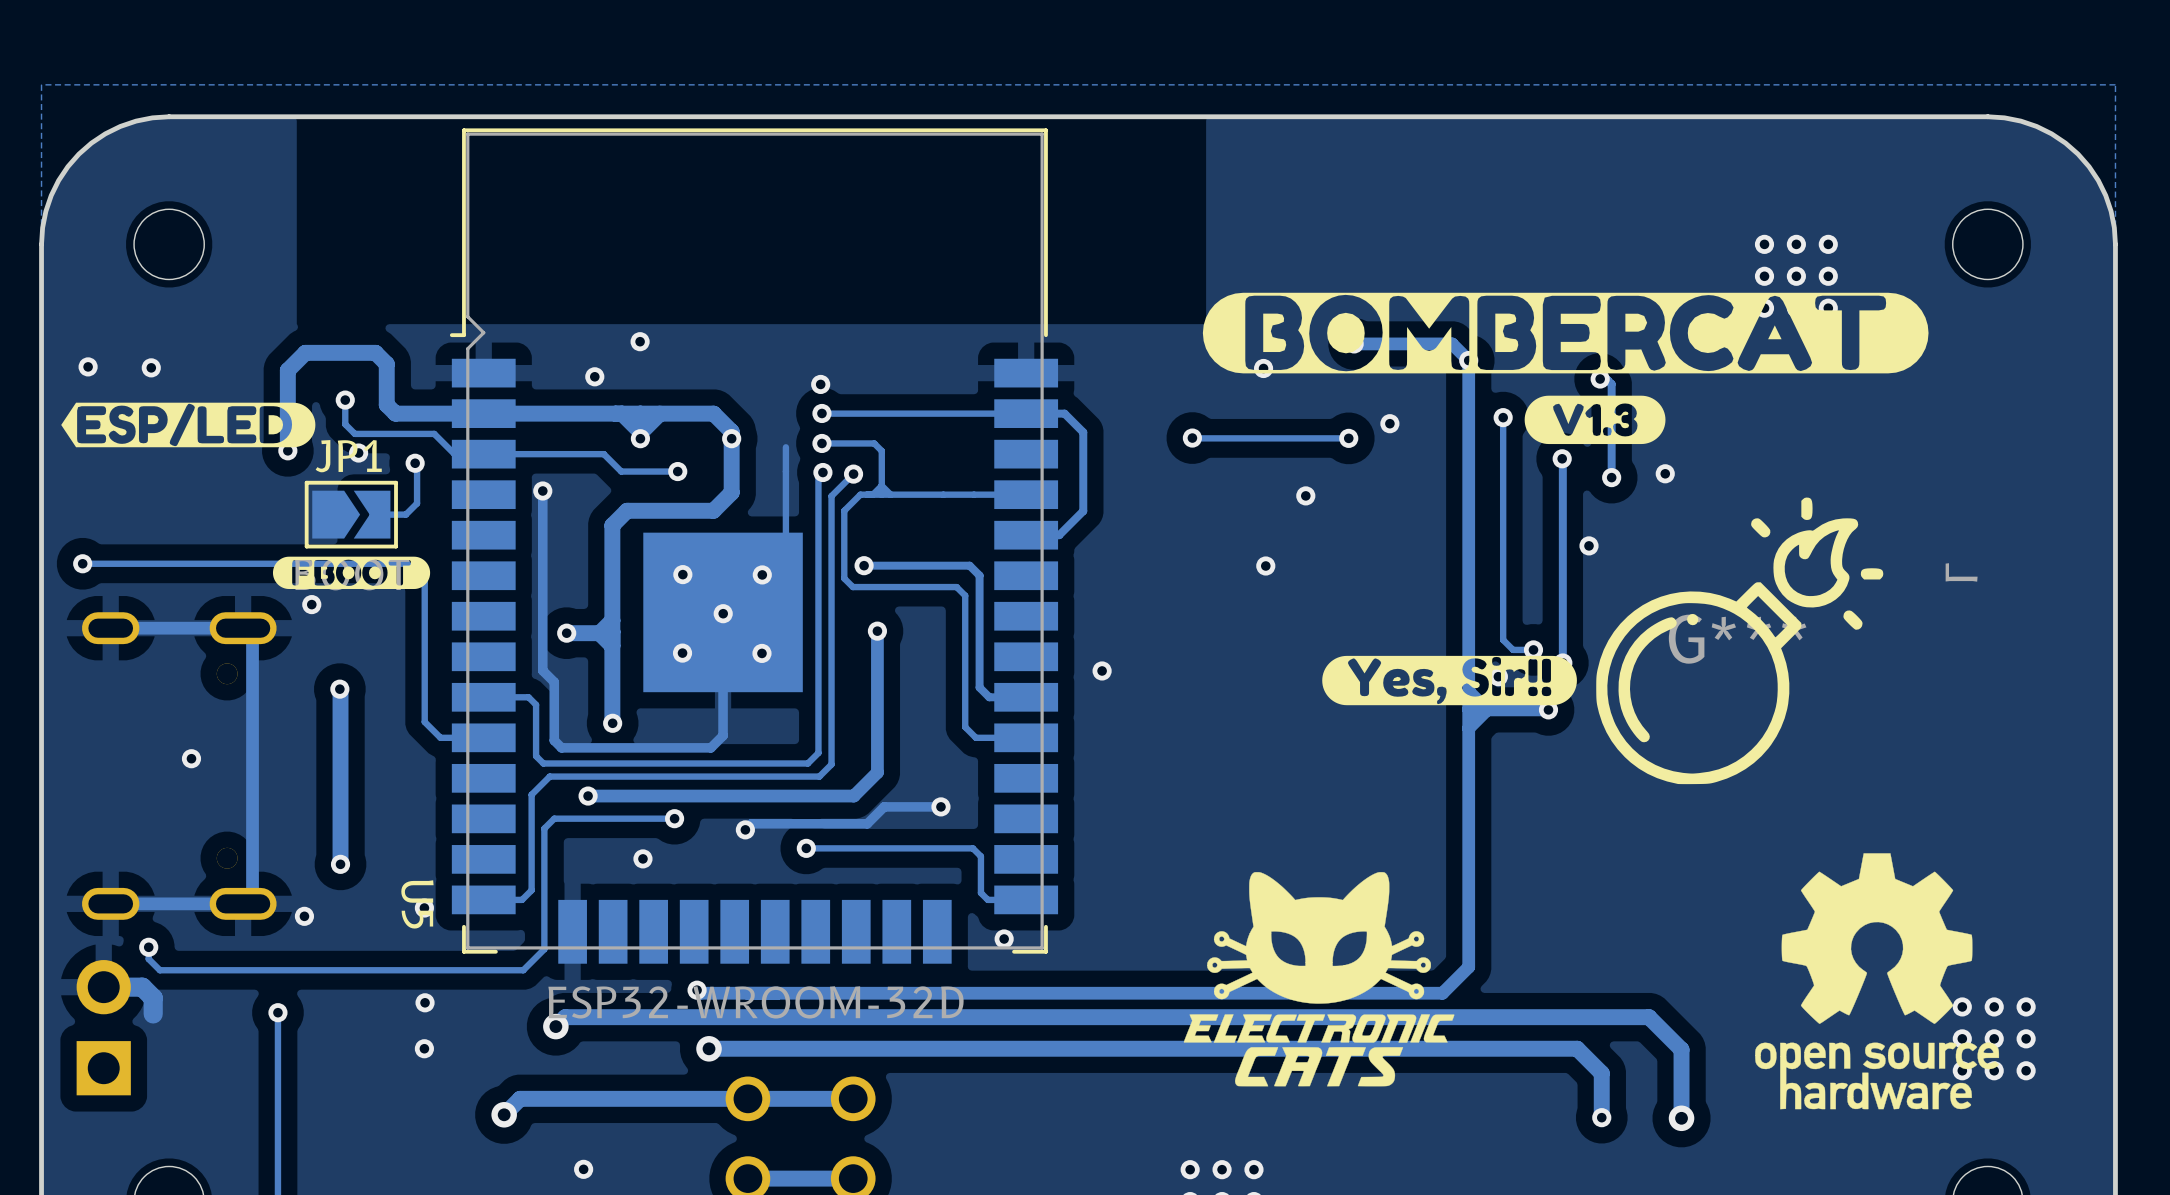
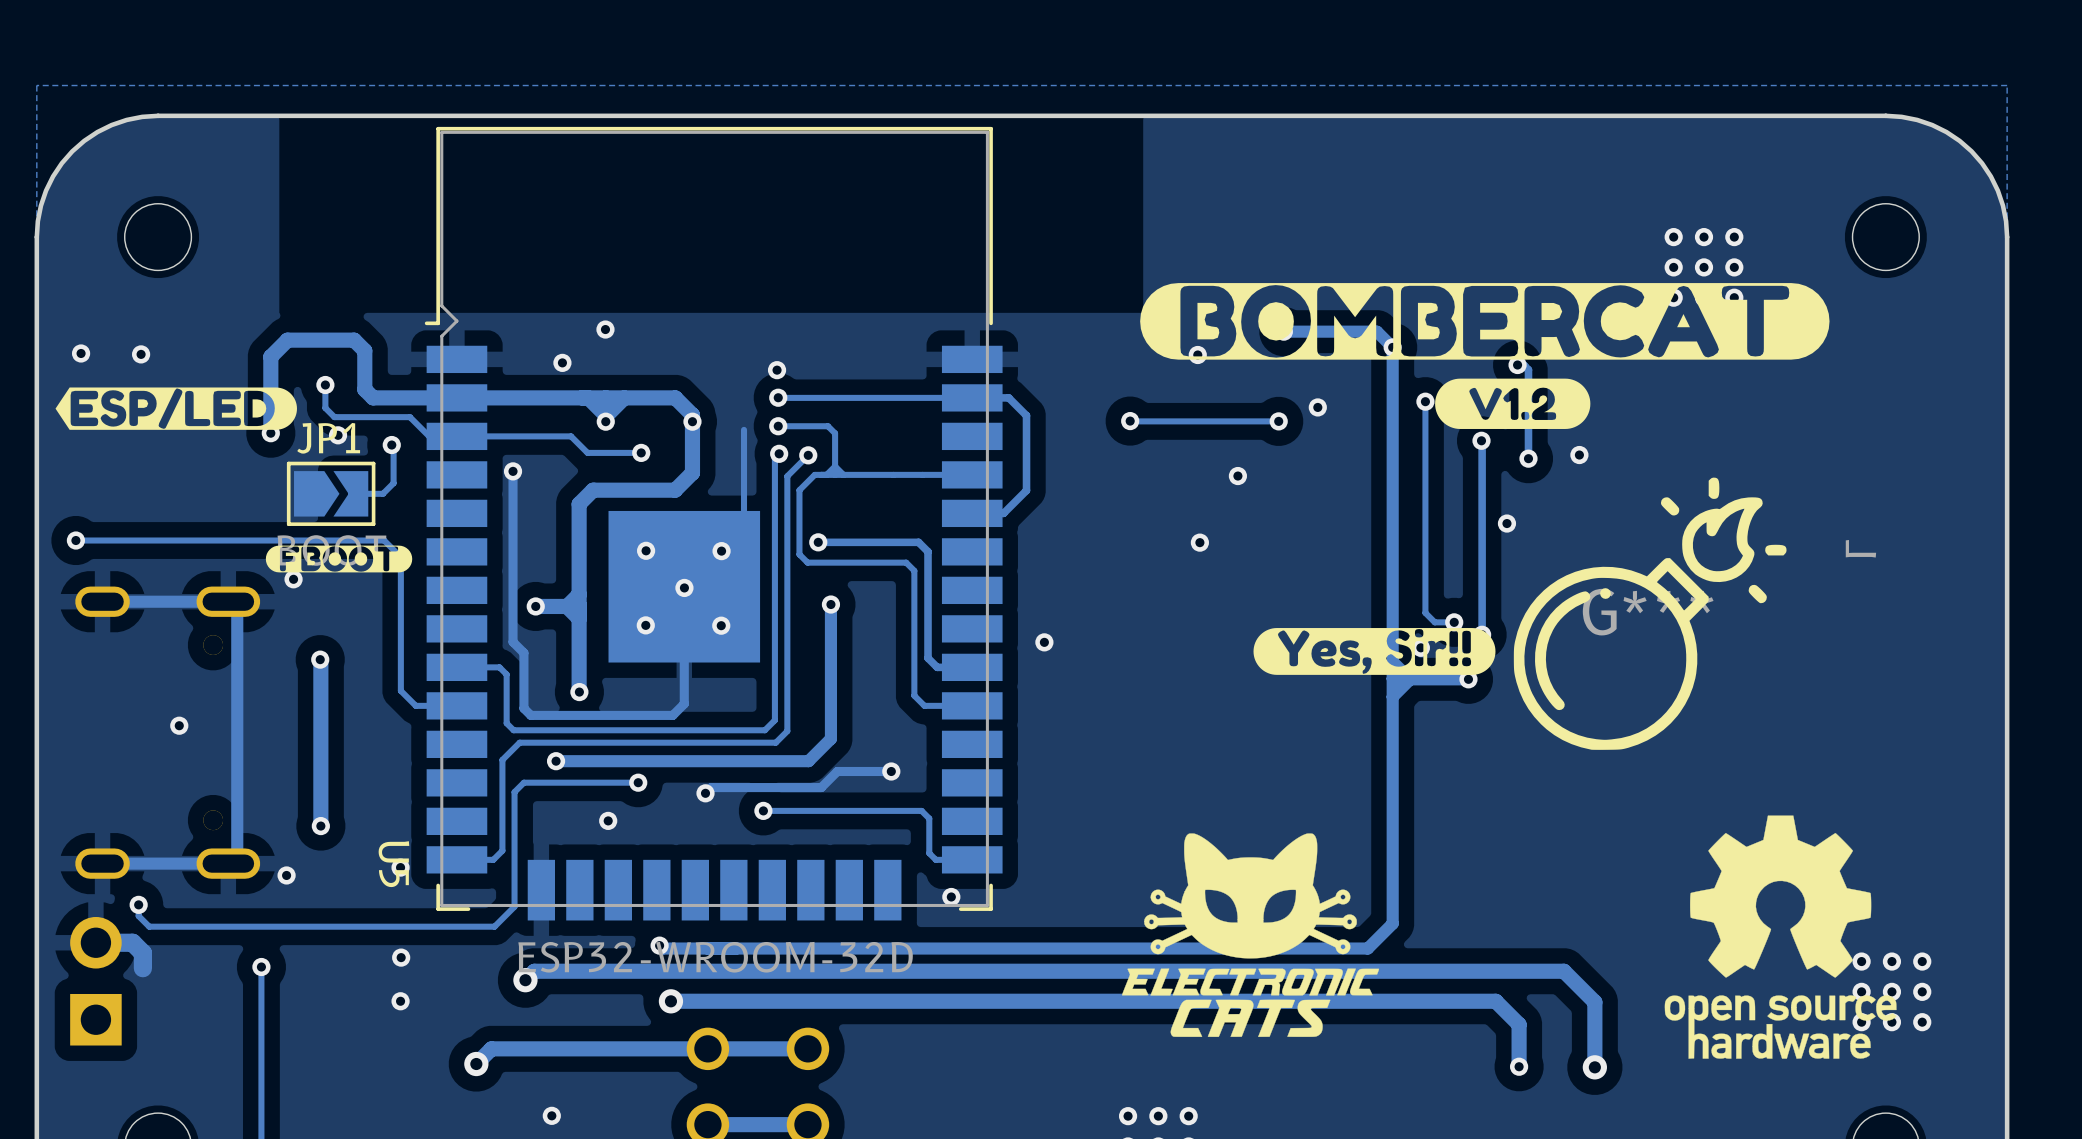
drawing shape: [1524, 395, 1666, 445] -> [1435, 378, 1591, 429]
drawing shape: [272, 556, 431, 590] -> [265, 545, 413, 573]

